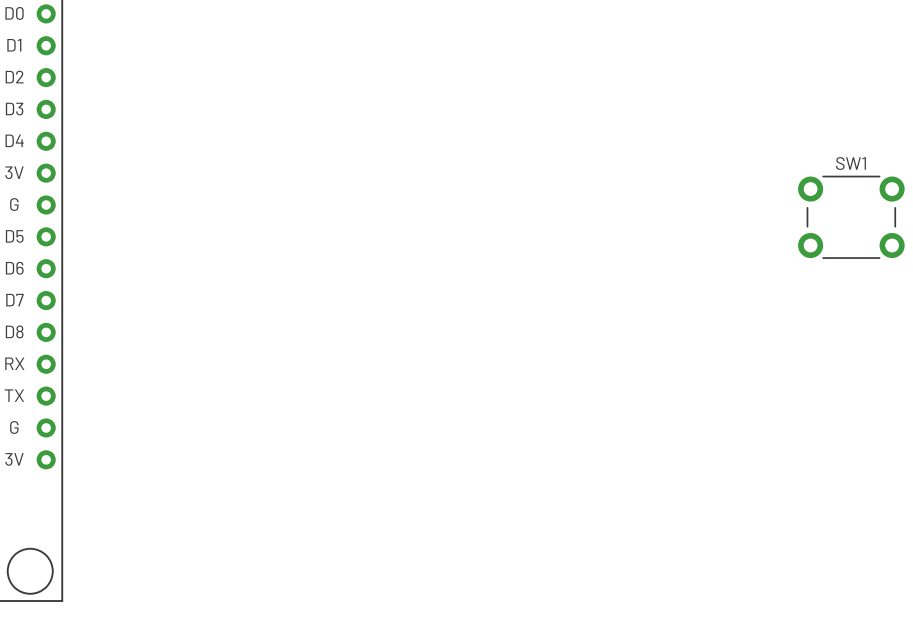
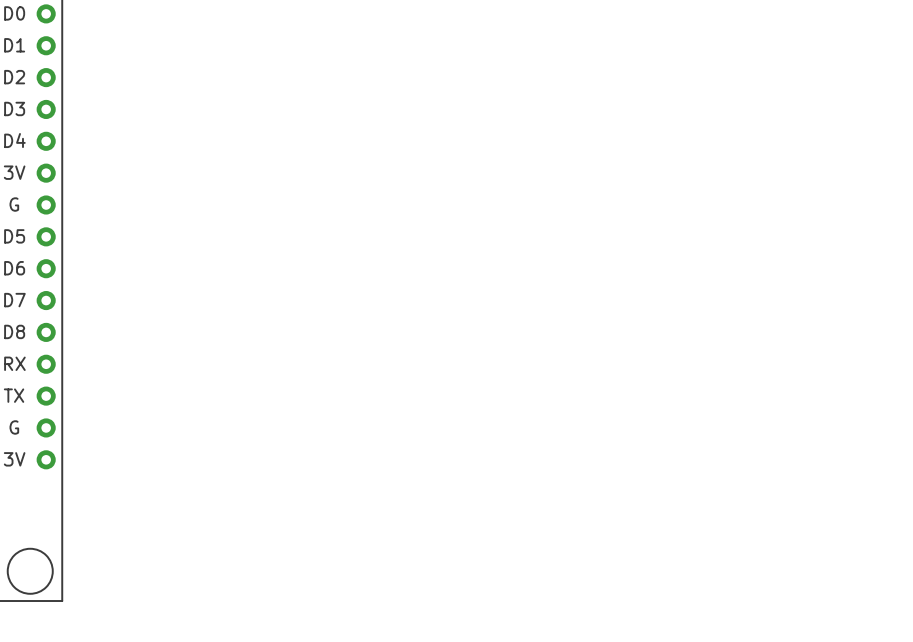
SW1: (851, 217) -> none

